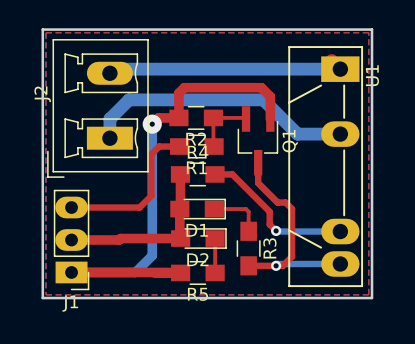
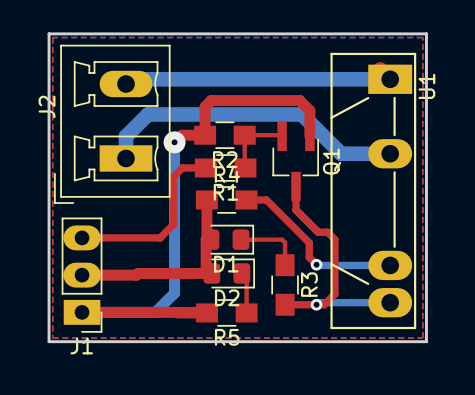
D1 footprint: [170, 198, 226, 220] -> [202, 224, 255, 255]
D2 footprint: [171, 228, 227, 249] -> [203, 258, 255, 289]

